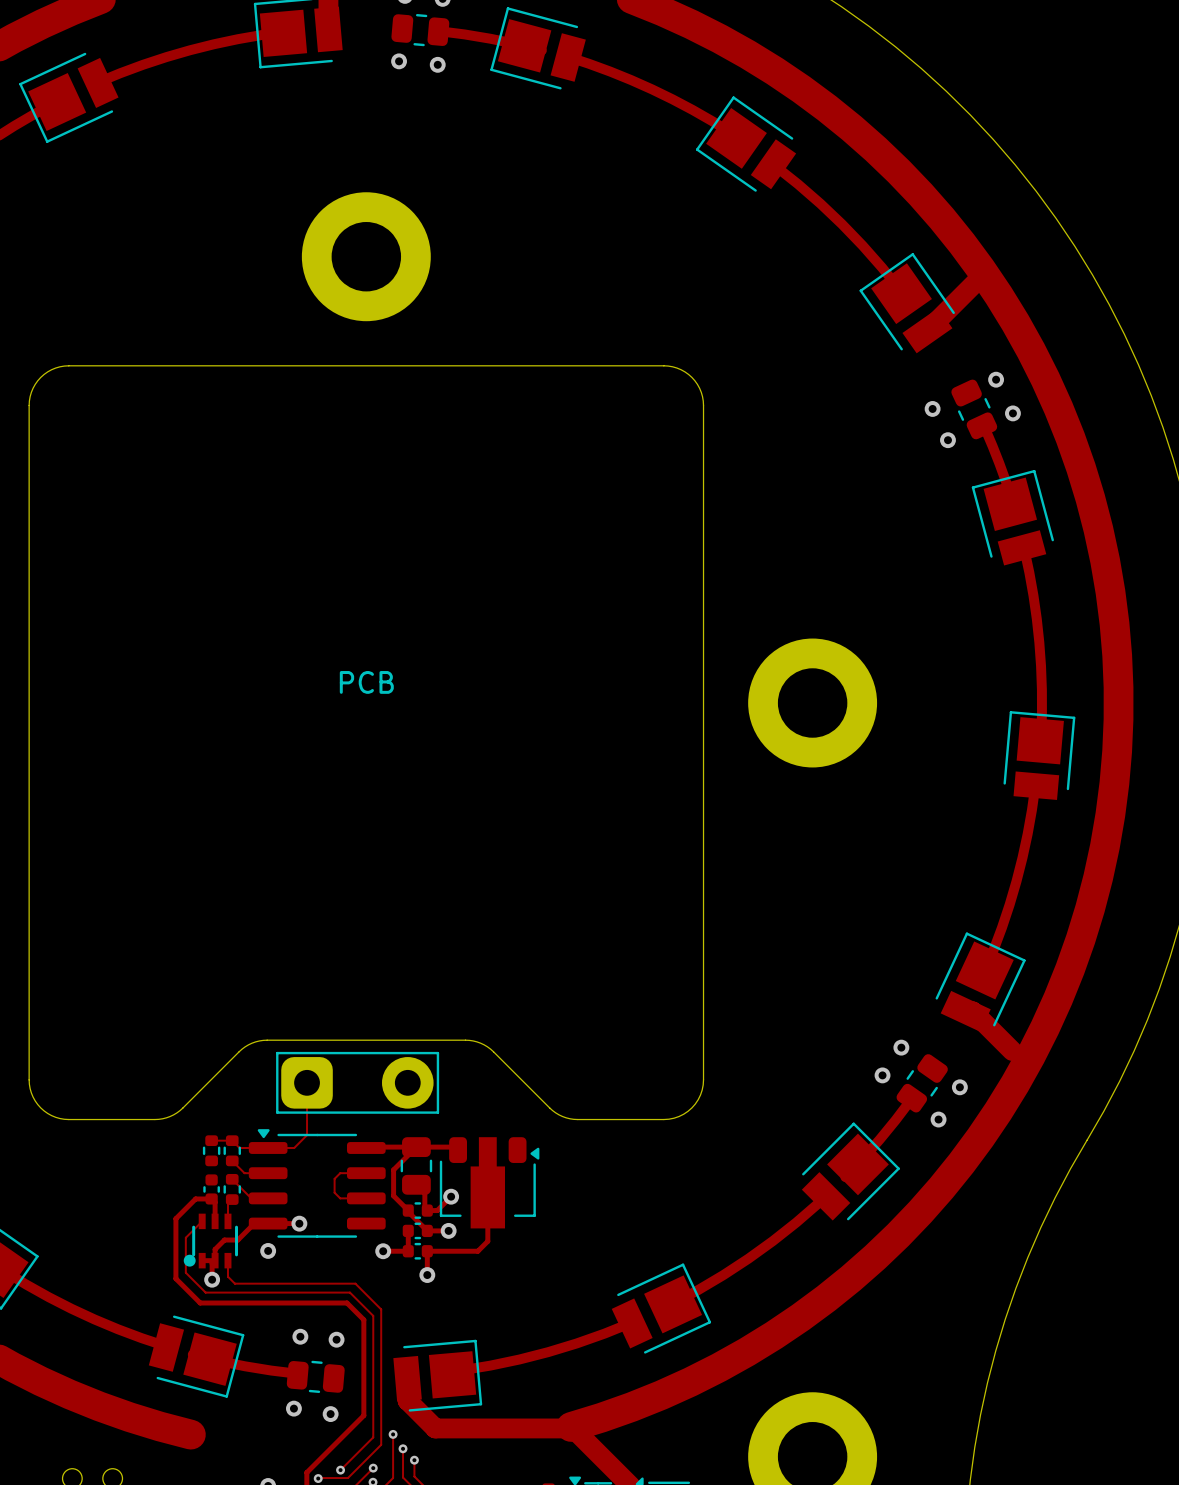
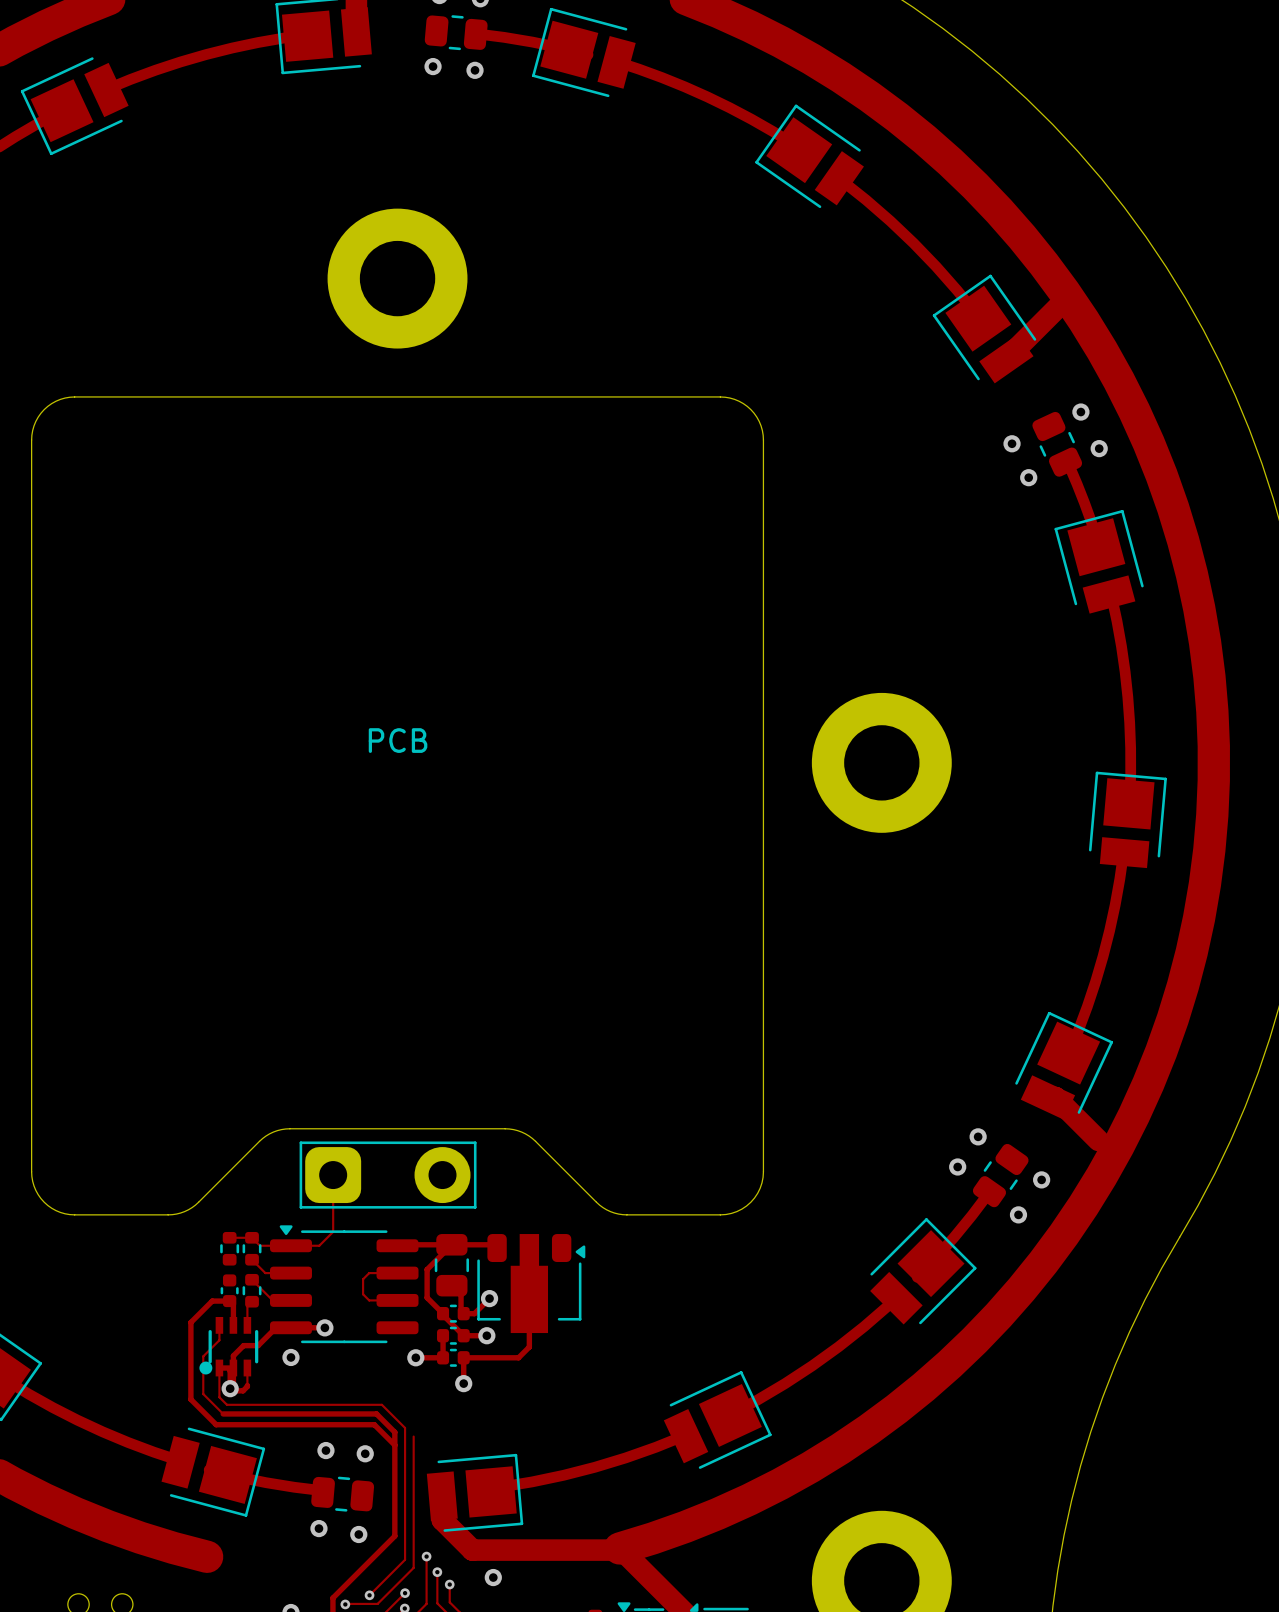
track: (202, 1221) (185, 1237) (185, 1272) (205, 1292) (349, 1292) (351, 1294) -> (219, 1368) (219, 1397) (226, 1404) (381, 1404)
track: (227, 1276) (234, 1283) (355, 1283) (381, 1309) (381, 1323) -> (247, 1385) (243, 1390) (233, 1390) (233, 1368)
track: (175, 1278) (200, 1303) (205, 1303) -> (219, 1325) (219, 1340) (203, 1356) (203, 1394) (223, 1413)
track: none -> (190, 1387) (190, 1399) (216, 1424) (374, 1424) (394, 1445)
via: none -> (493, 1577)

